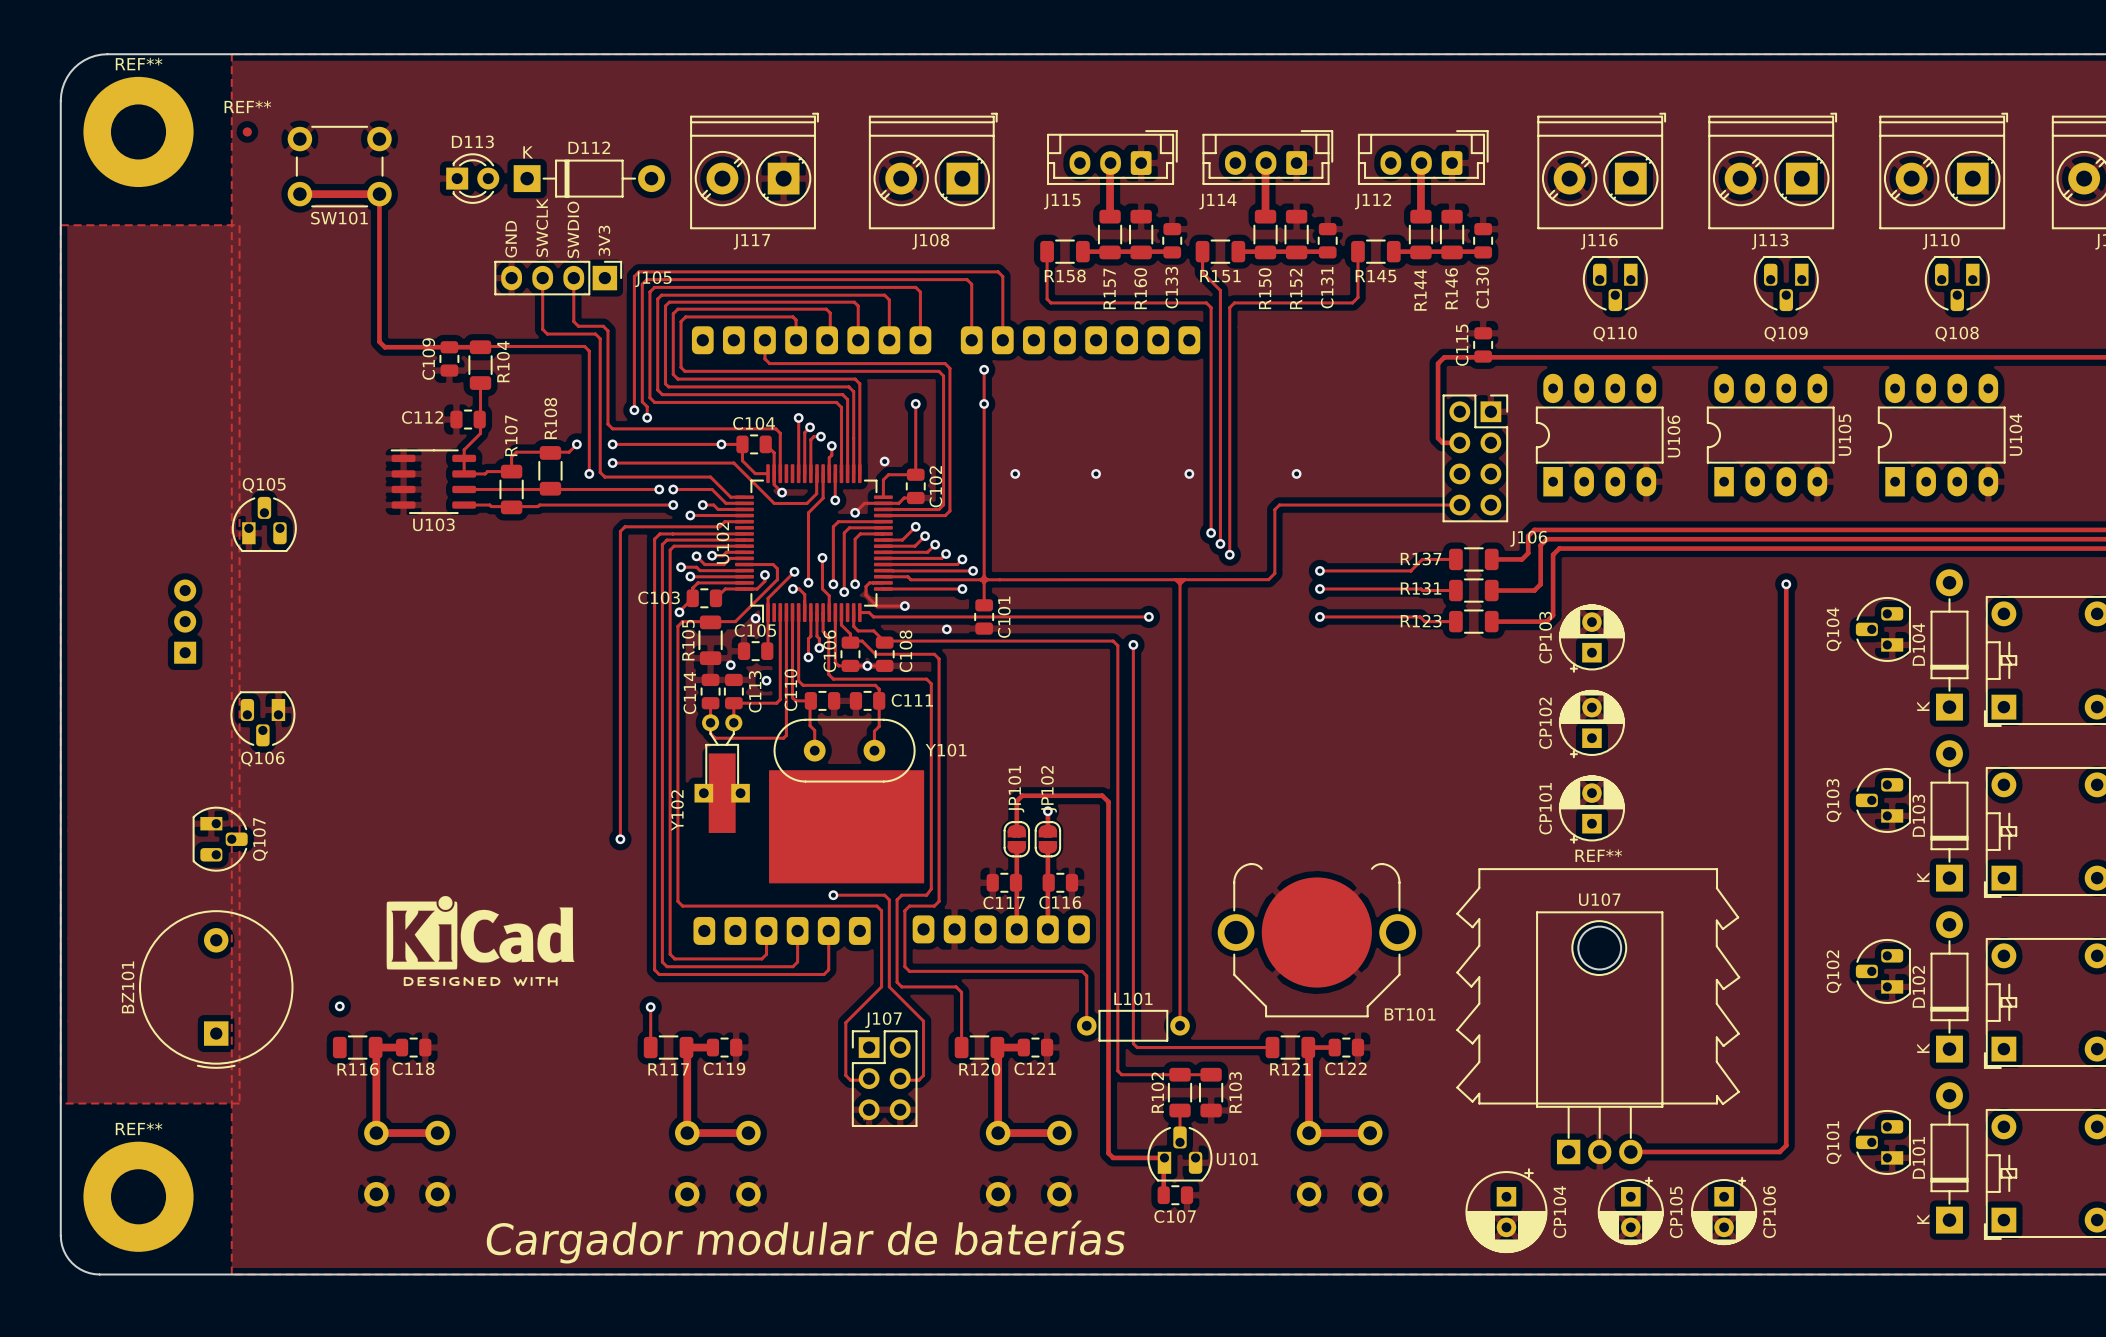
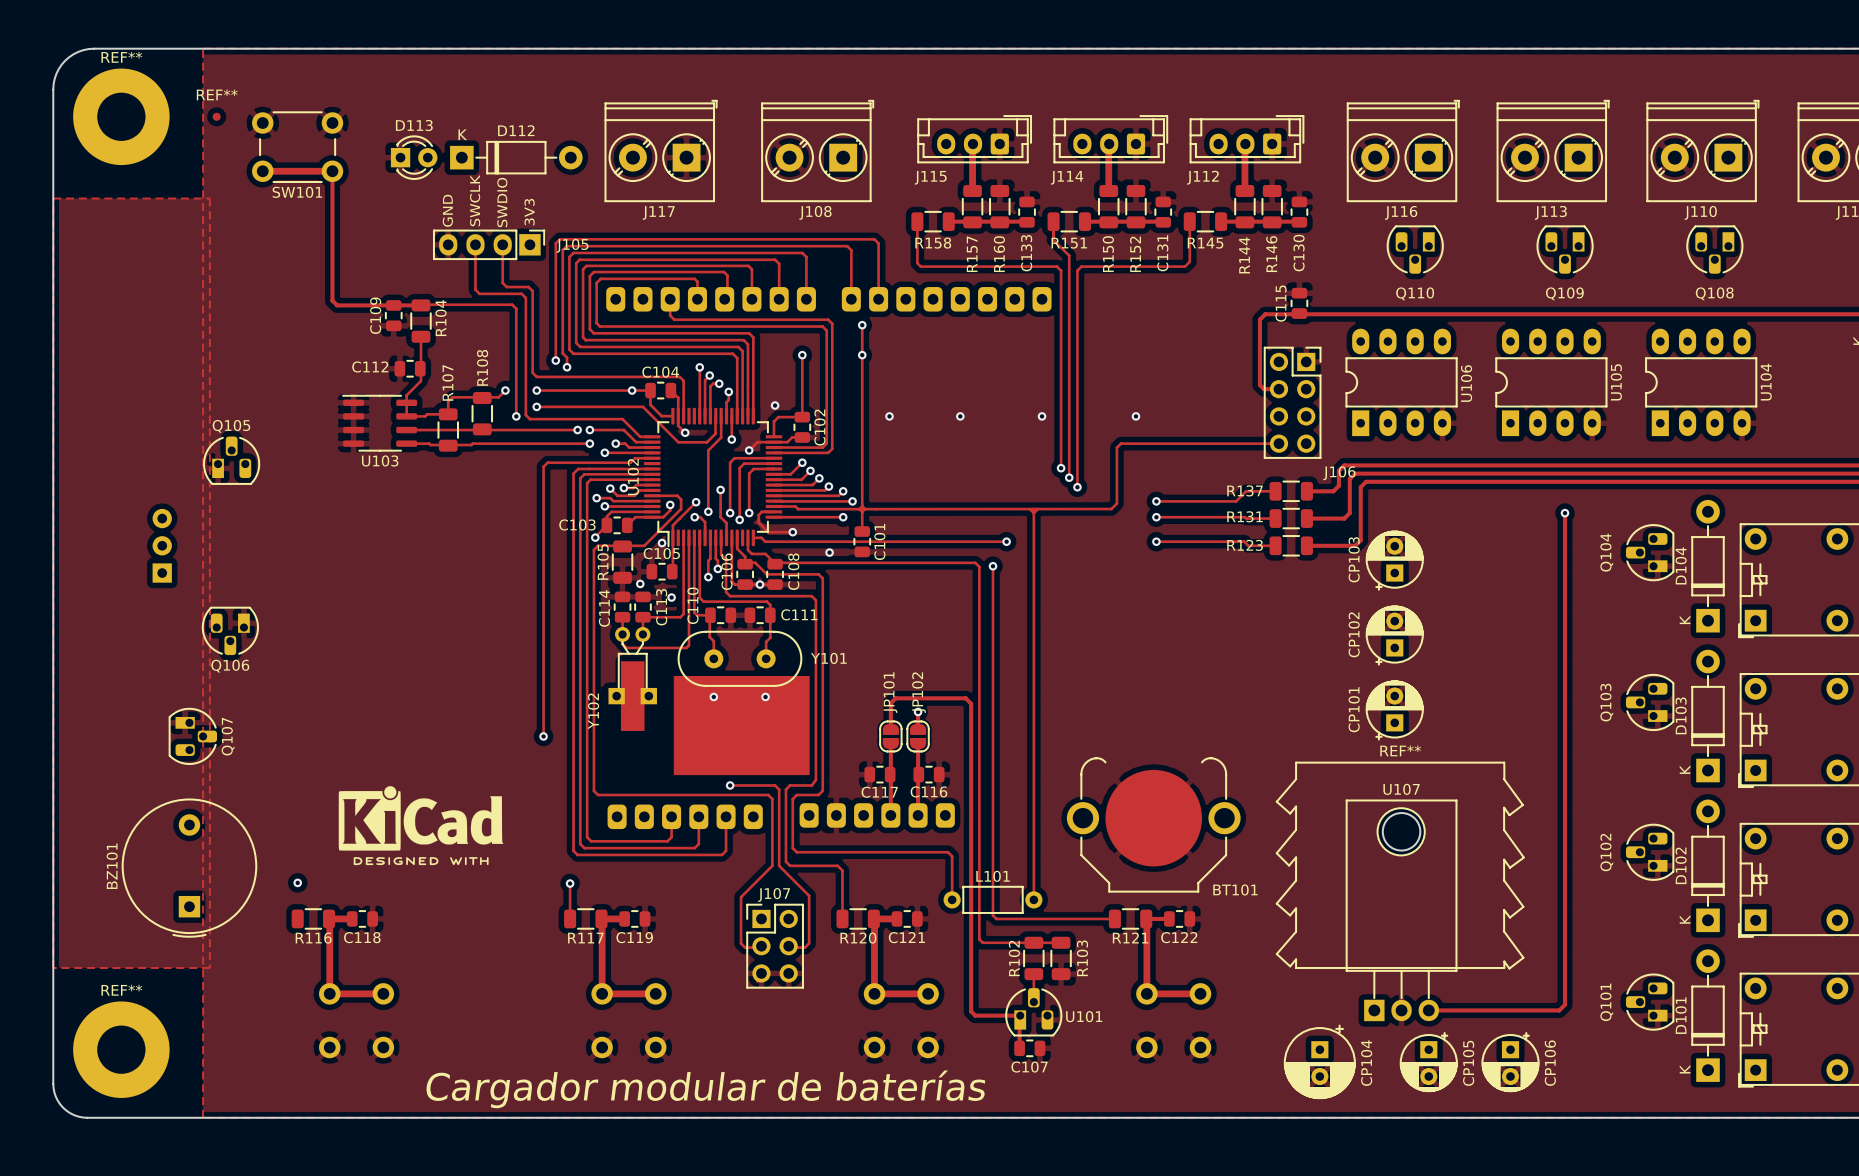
via: none -> (713, 696)
via: none -> (765, 696)

